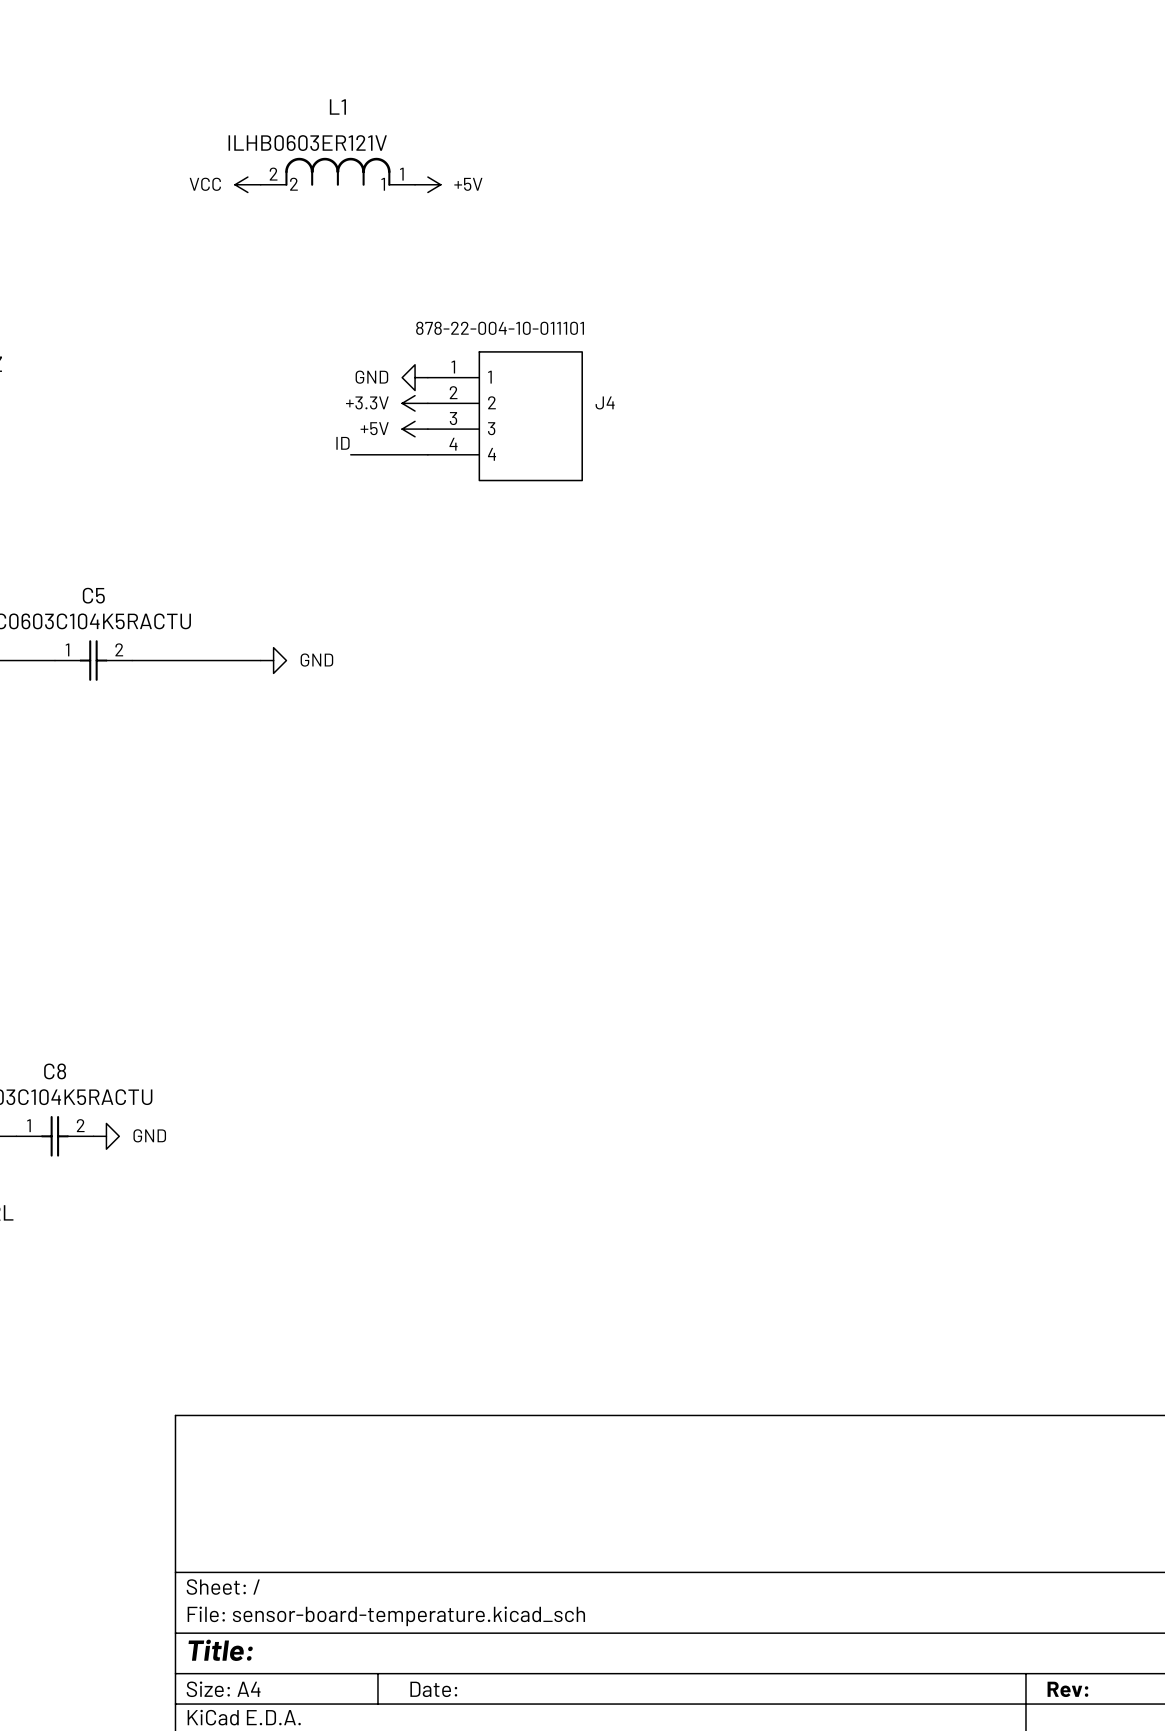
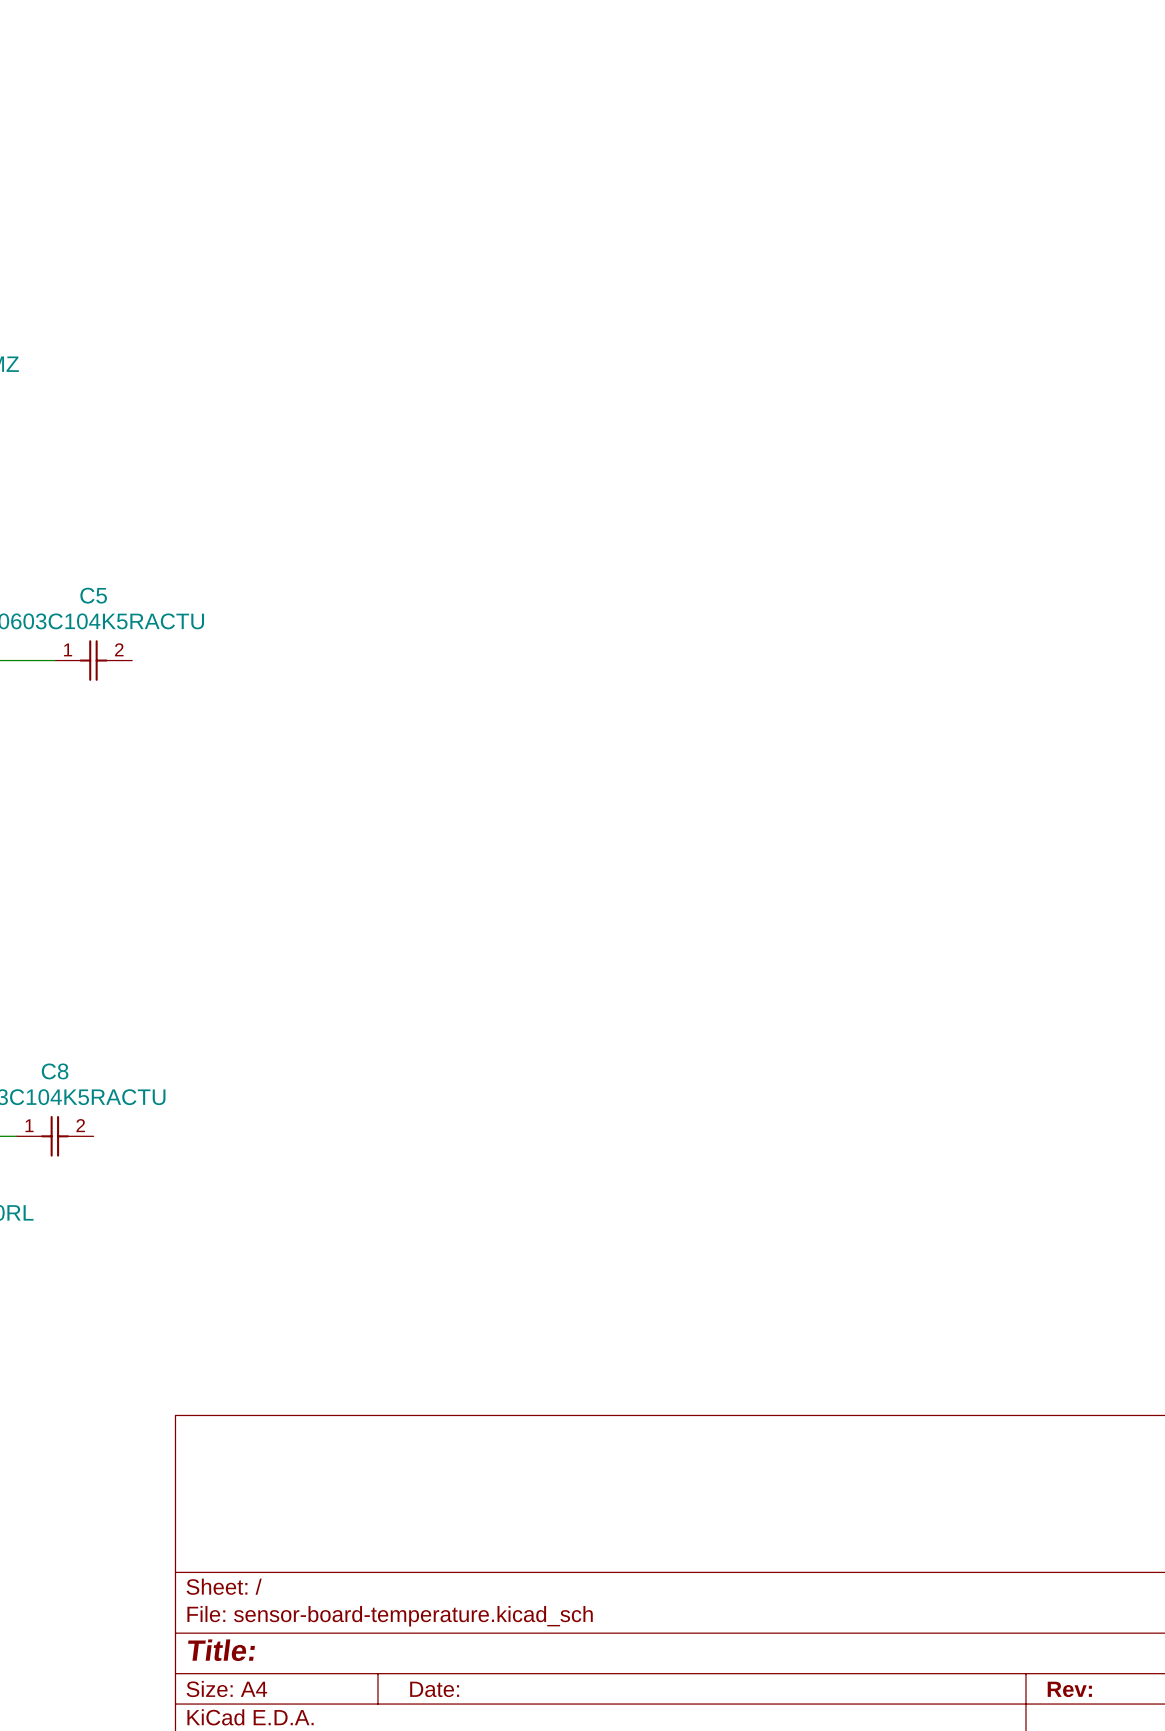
L1: ILHB0603ER121V (337, 171) -> none
power symbol: VCC (247, 184) -> none
power symbol: +5V (427, 184) -> none
power symbol: GND (415, 377) -> none
power symbol: +3.3V (415, 403) -> none
J4: 878-22-004-10-011101 (505, 416) -> none
power symbol: +5V (415, 429) -> none
label: ID (342, 443) -> none
wire: (350, 454) (427, 454) -> none
wire: (132, 660) (260, 660) -> none
power symbol: GND (273, 660) -> none
power symbol: GND (106, 1136) -> none

